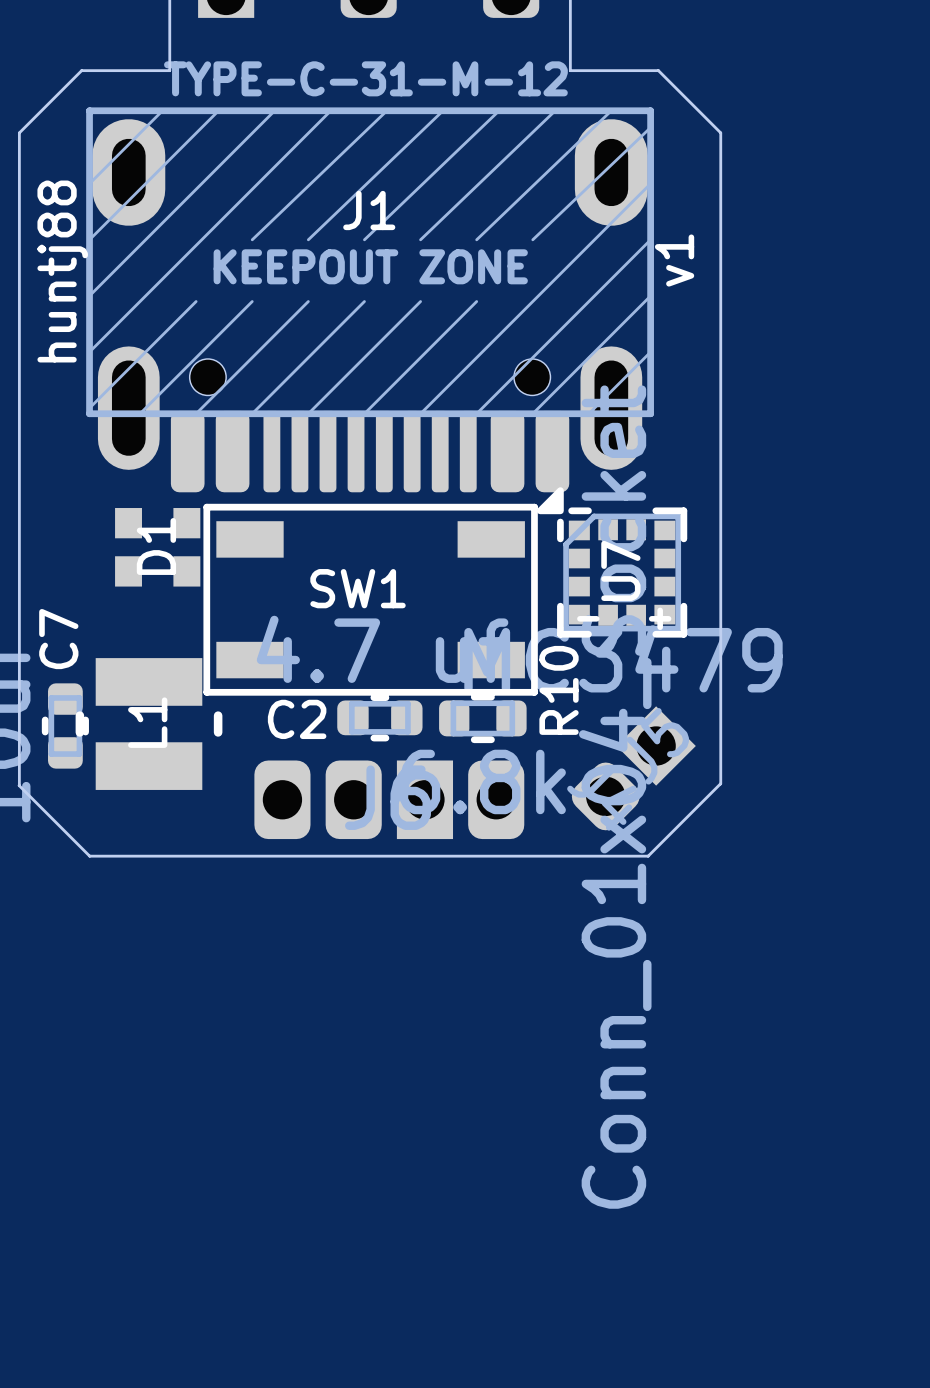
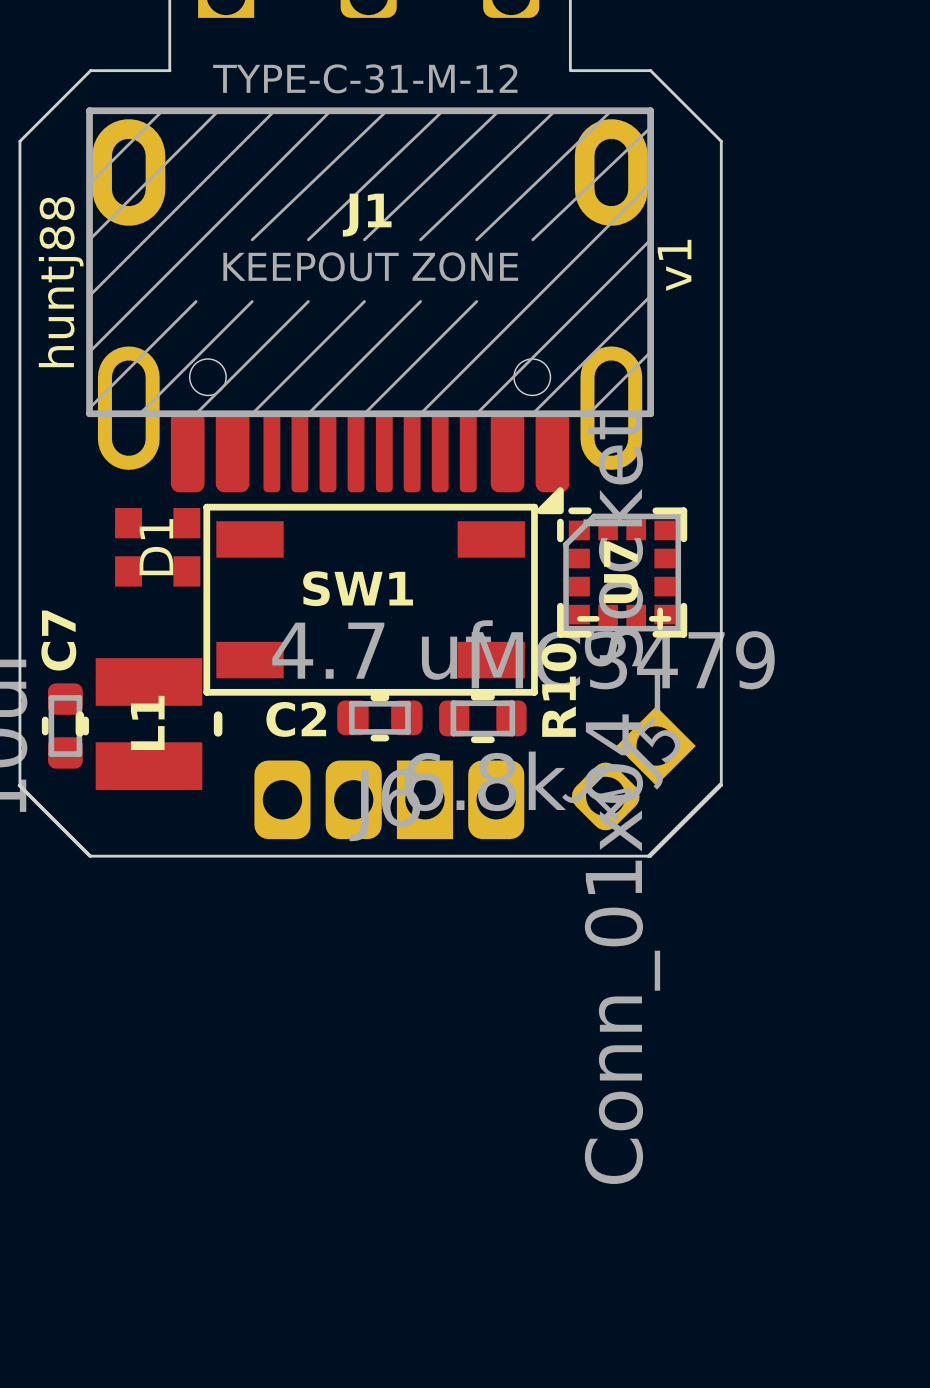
board edge: (90, 70) (81, 70) (19, 132) (19, 785) -> (90, 70) (19, 141) (19, 785) (90, 856)
board edge: (650, 70) (658, 70) (720, 132) (720, 783) -> (650, 70) (721, 141) (721, 785) (650, 856) (648, 856)

